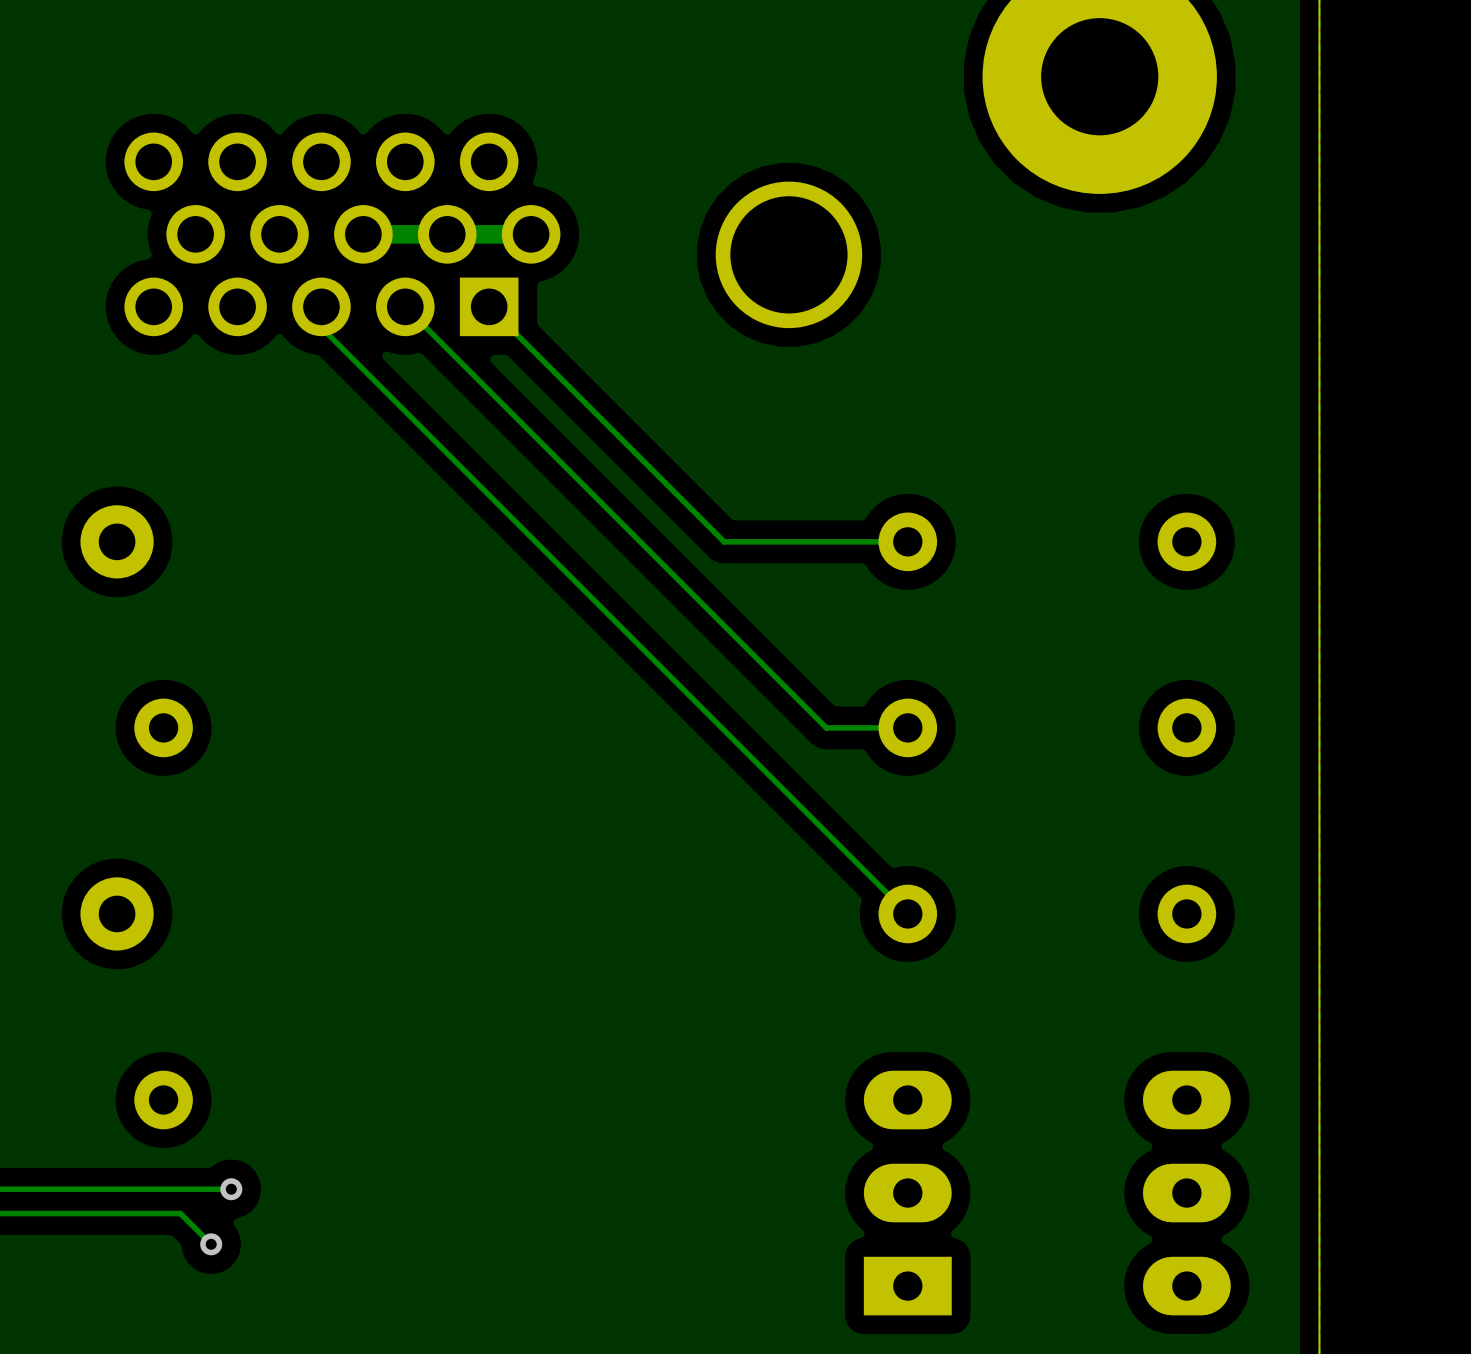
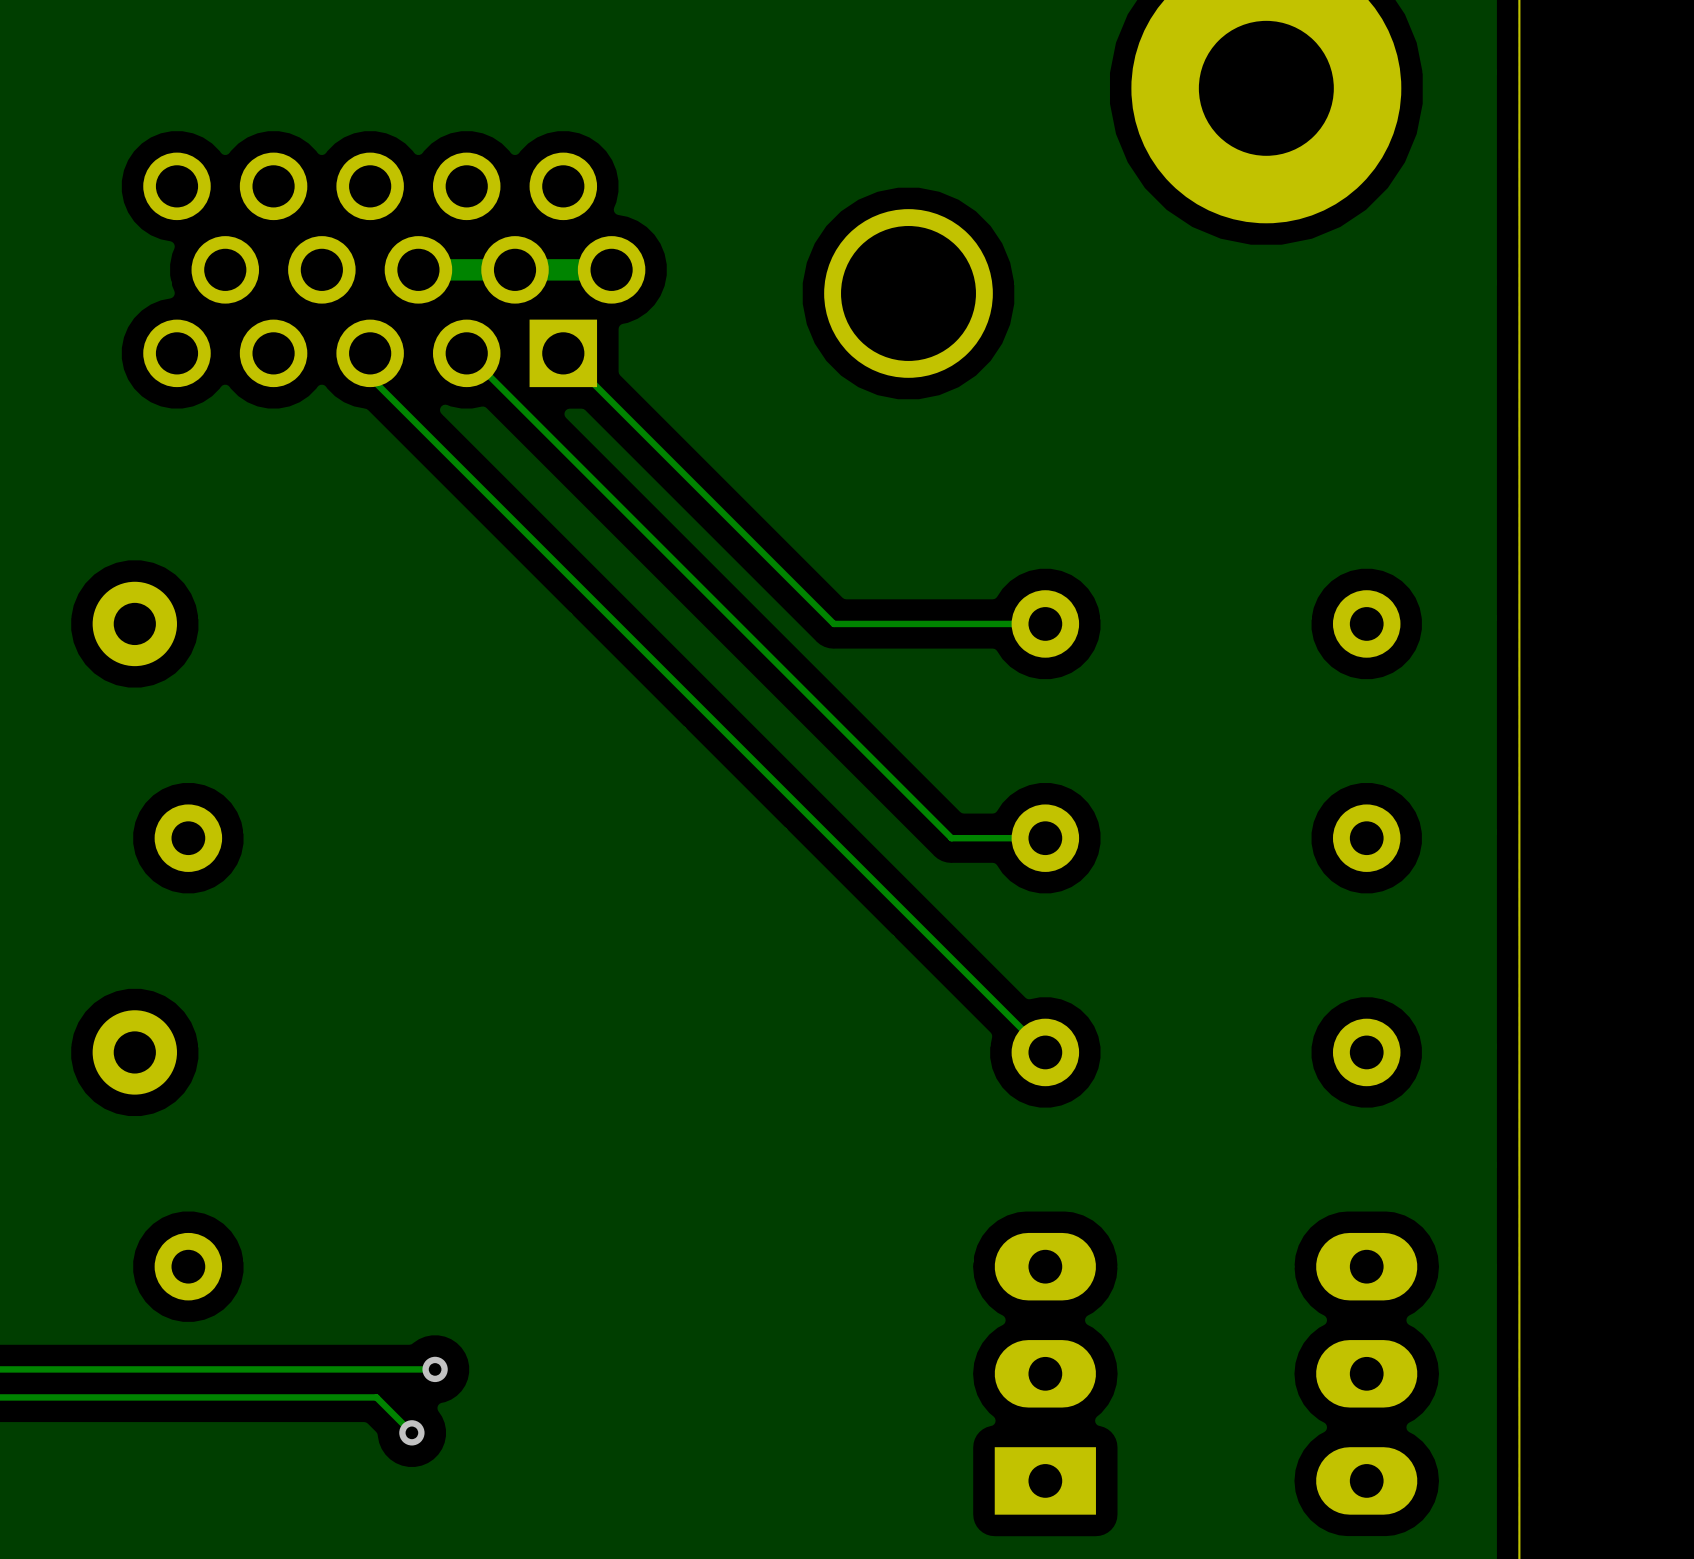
via: (231, 1189) -> none
track: none -> (435, 1369) (266, 1369)
via: none -> (435, 1369)
track: (180, 1213) (211, 1244) -> (207, 1397) (376, 1397) (411, 1432)
via: (211, 1244) -> none
via: none -> (411, 1432)

